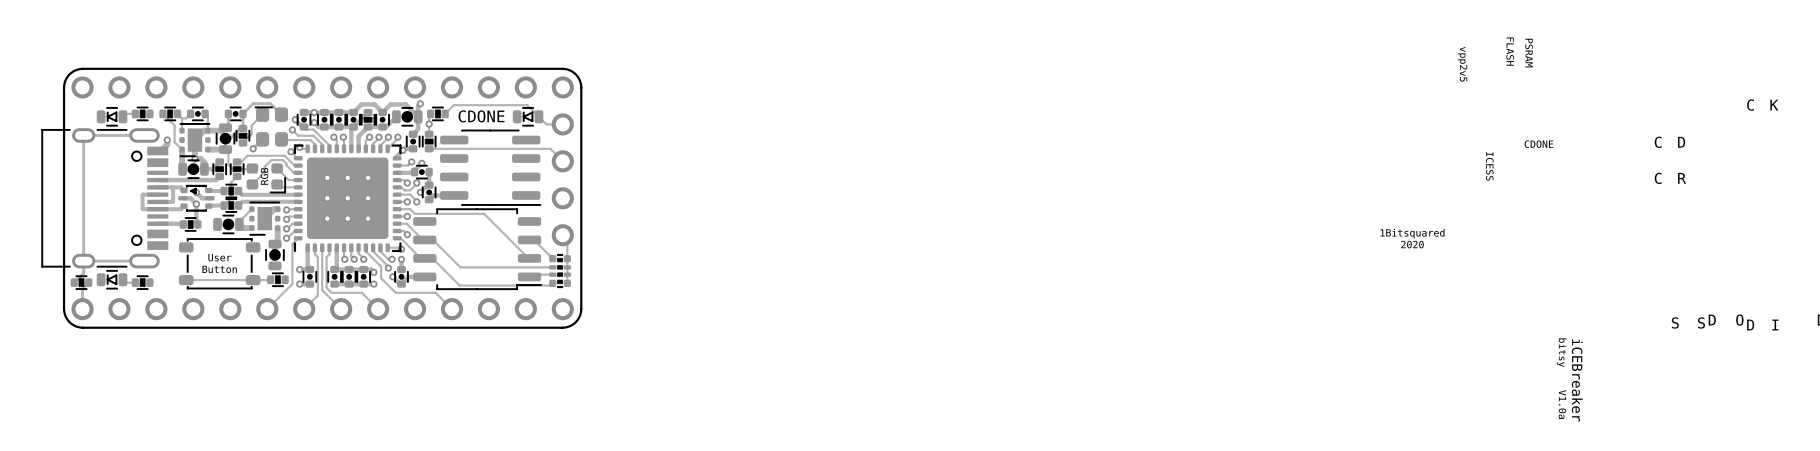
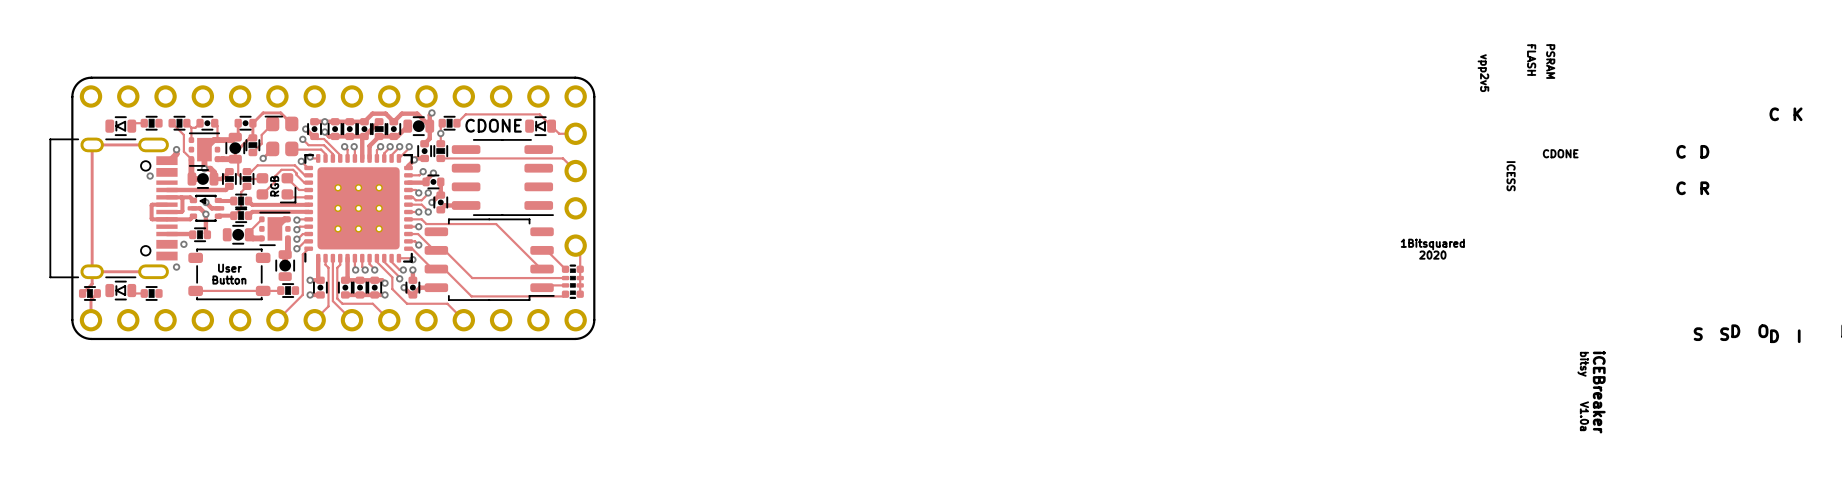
via: none -> (150, 176)
via: none -> (183, 244)
via: none -> (176, 267)

